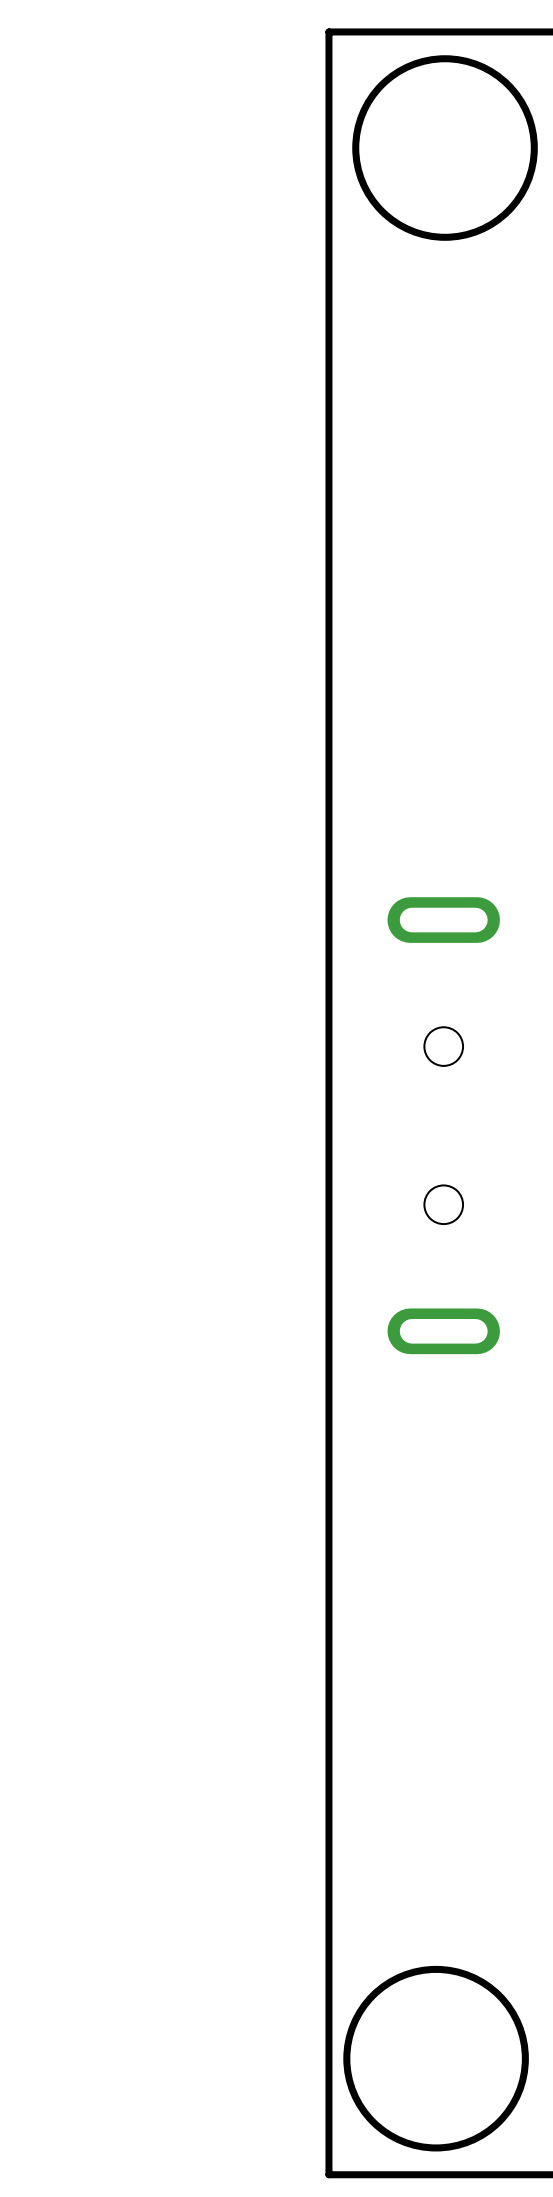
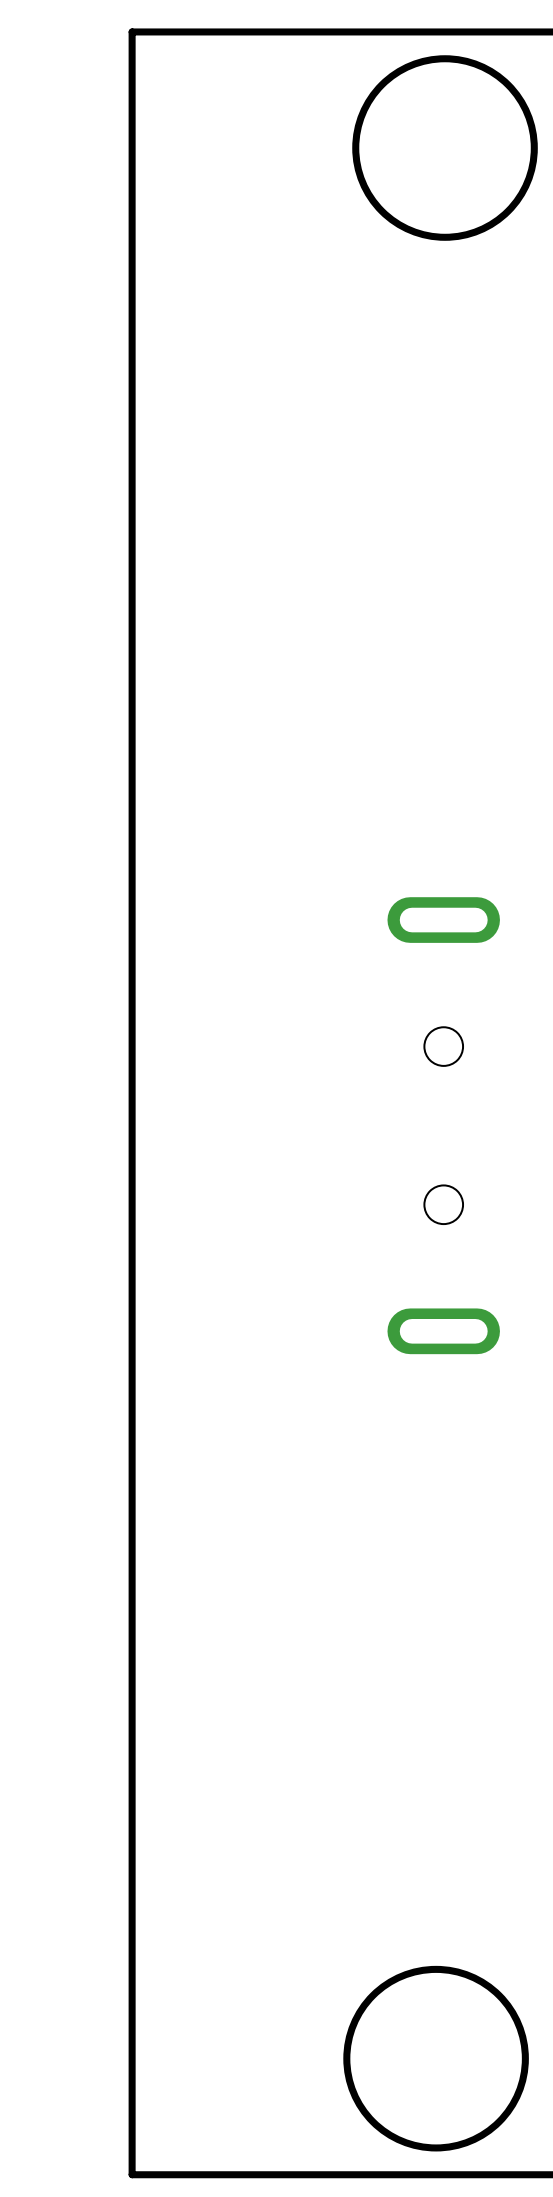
board edge: (328, 31) (328, 2174) -> (328, 31) (132, 31) (132, 2174) (328, 2174)

